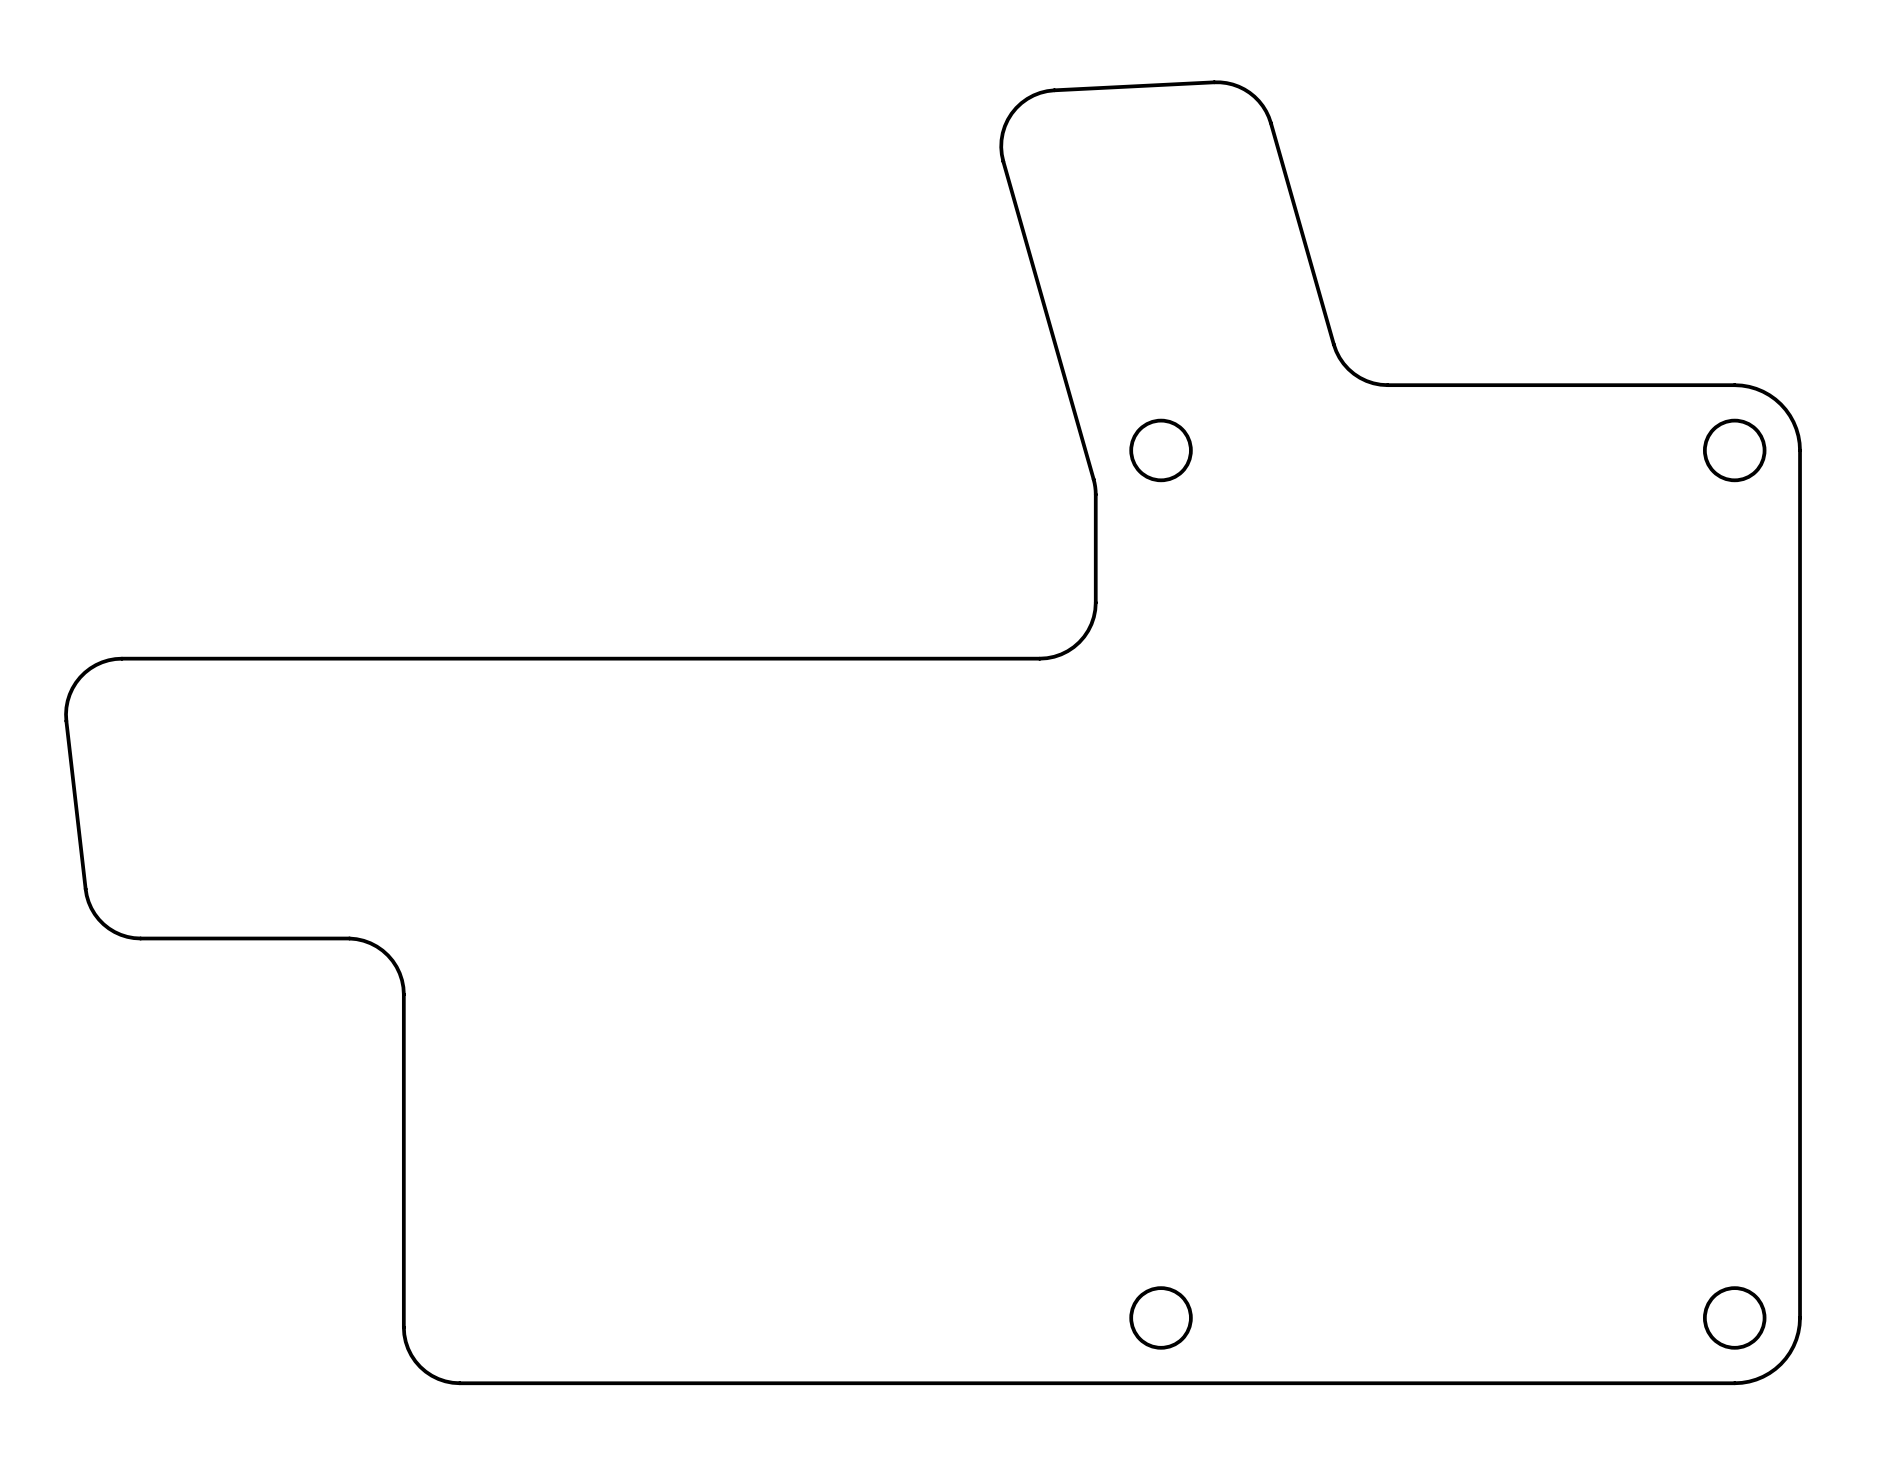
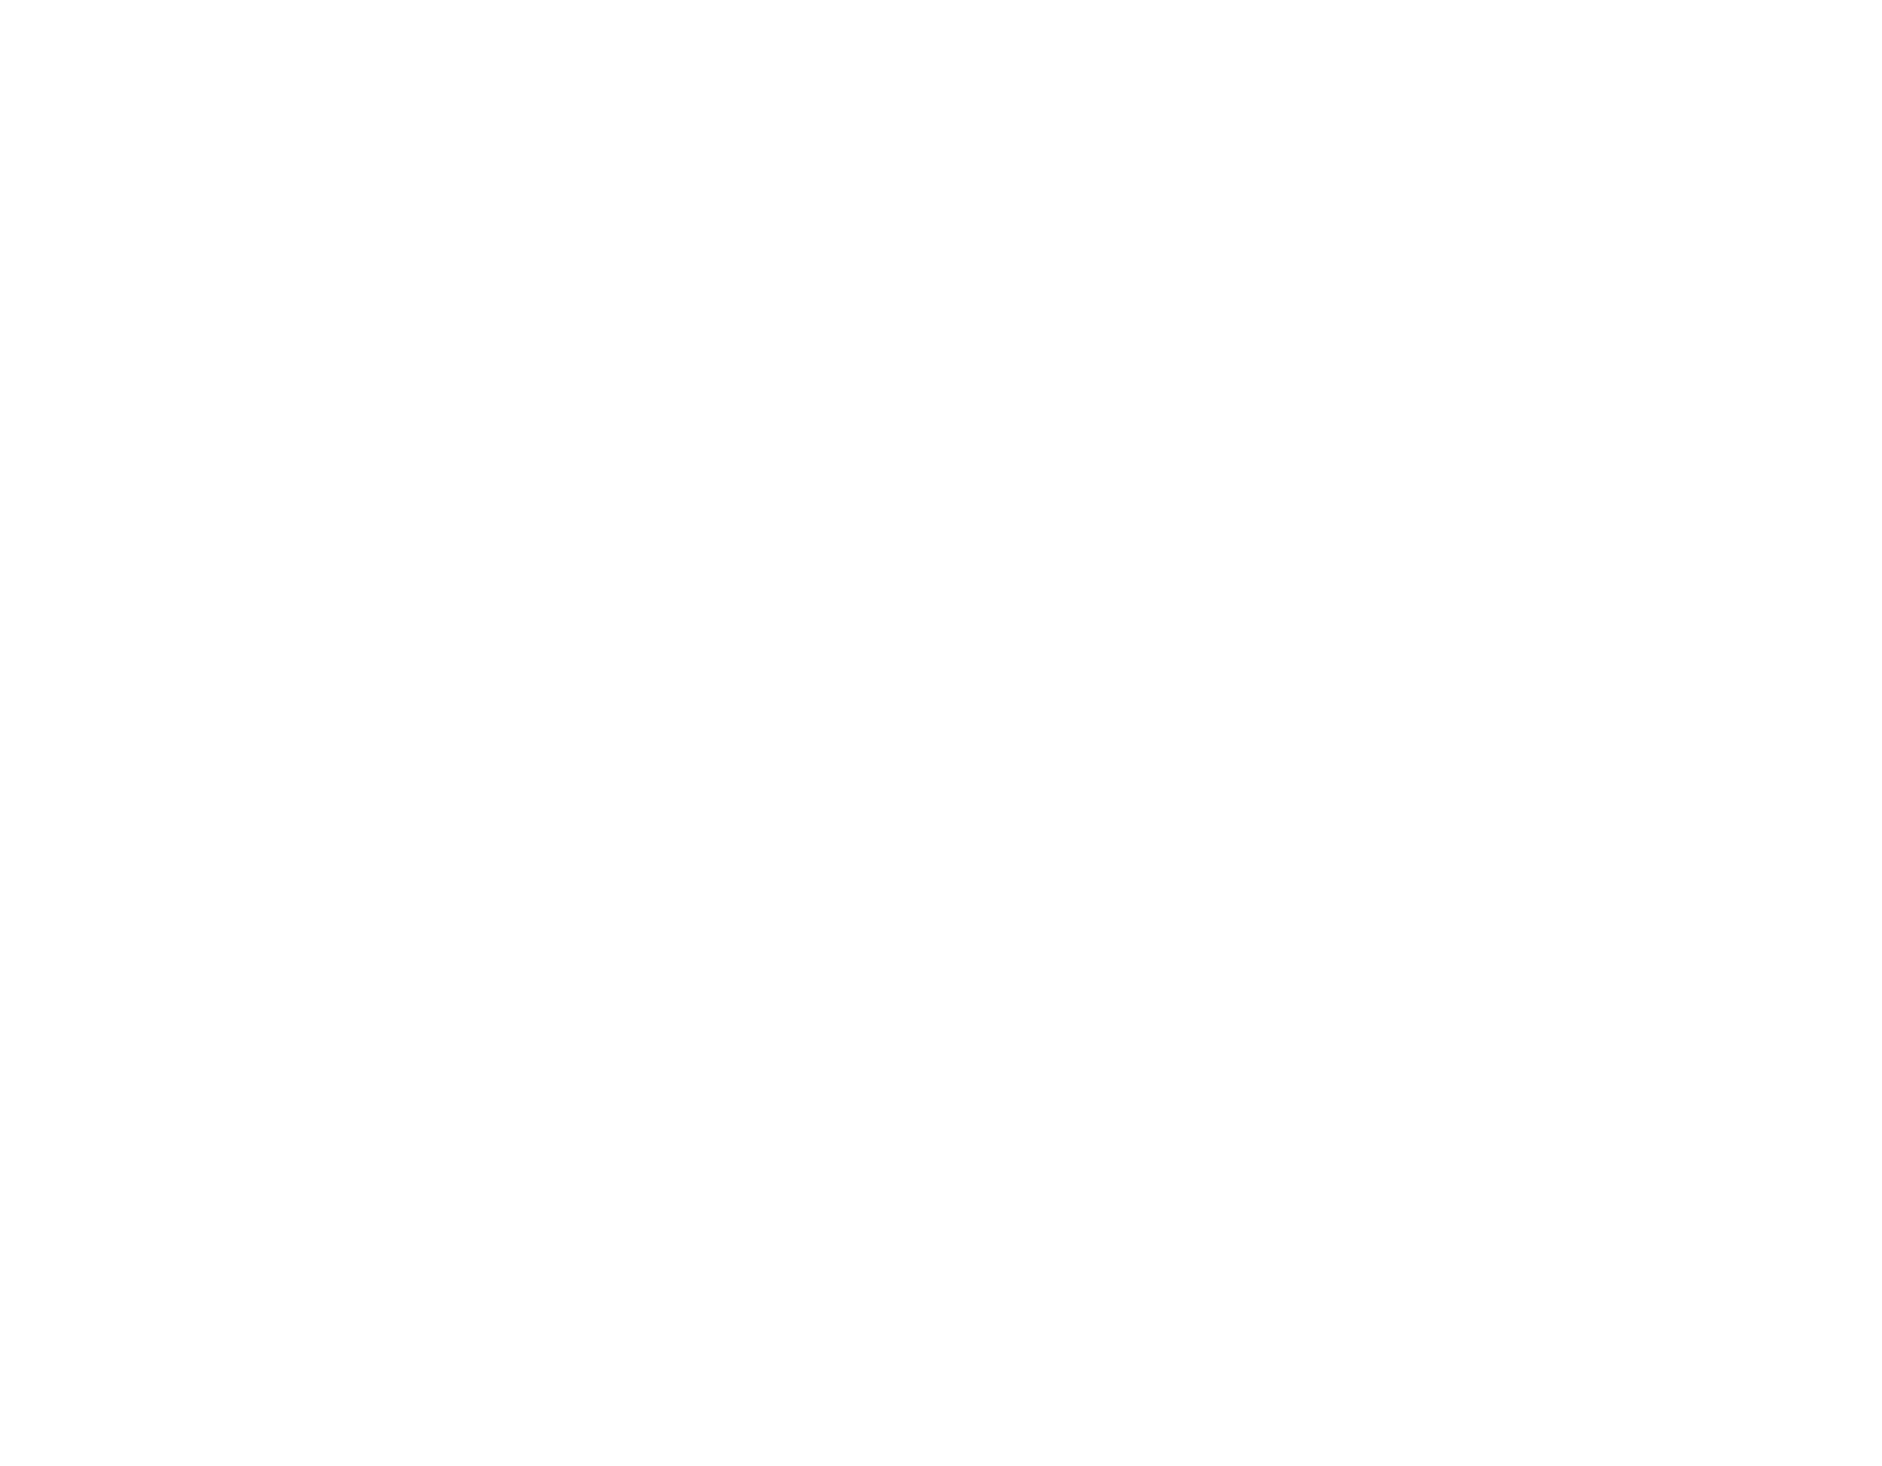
board edge: (1387, 385) (1742, 385) (1763, 391) (1775, 399) (1785, 409) (1796, 428) (1800, 450) (1800, 1317) (1798, 1332) (1790, 1352) (1775, 1369) (1756, 1379) (1734, 1383) (459, 1383) (445, 1381) (431, 1375) (420, 1366) (408, 1348) (404, 1334) (403, 994) (402, 980) (392, 960) (382, 950) (370, 943) (349, 938) (140, 938) (127, 936) (114, 932) (103, 924) (94, 914) (88, 902) (66, 721) (66, 707) (72, 688) (80, 677) (96, 665) (108, 660) (121, 658) (1039, 658) (1054, 656) (1073, 647) (1088, 630) (1095, 610) (1095, 486) (1003, 161) (1001, 147) (1002, 133) (1007, 119) (1016, 108) (1033, 95) (1054, 90) (1214, 82) (1238, 86) (1254, 96) (1266, 111) (1270, 122) (1336, 351) (1343, 363) (1359, 377) (1373, 383) (1387, 385) -> none
round board edge: [1129, 418, 1193, 483] -> none
round board edge: [1703, 418, 1767, 483] -> none
round board edge: [1129, 1286, 1193, 1350] -> none
round board edge: [1703, 1286, 1767, 1350] -> none

